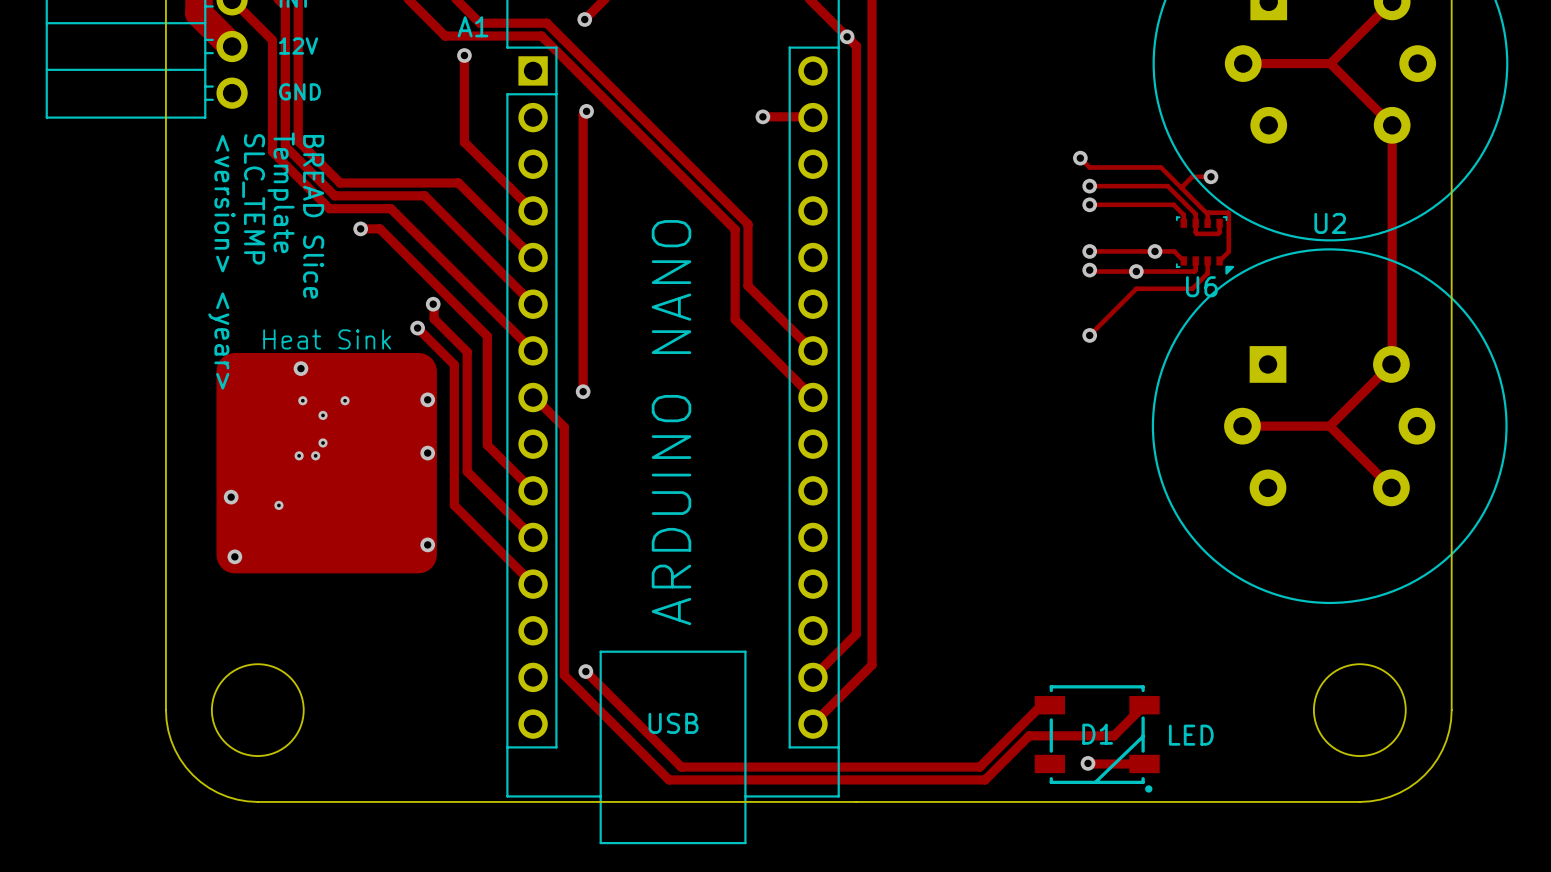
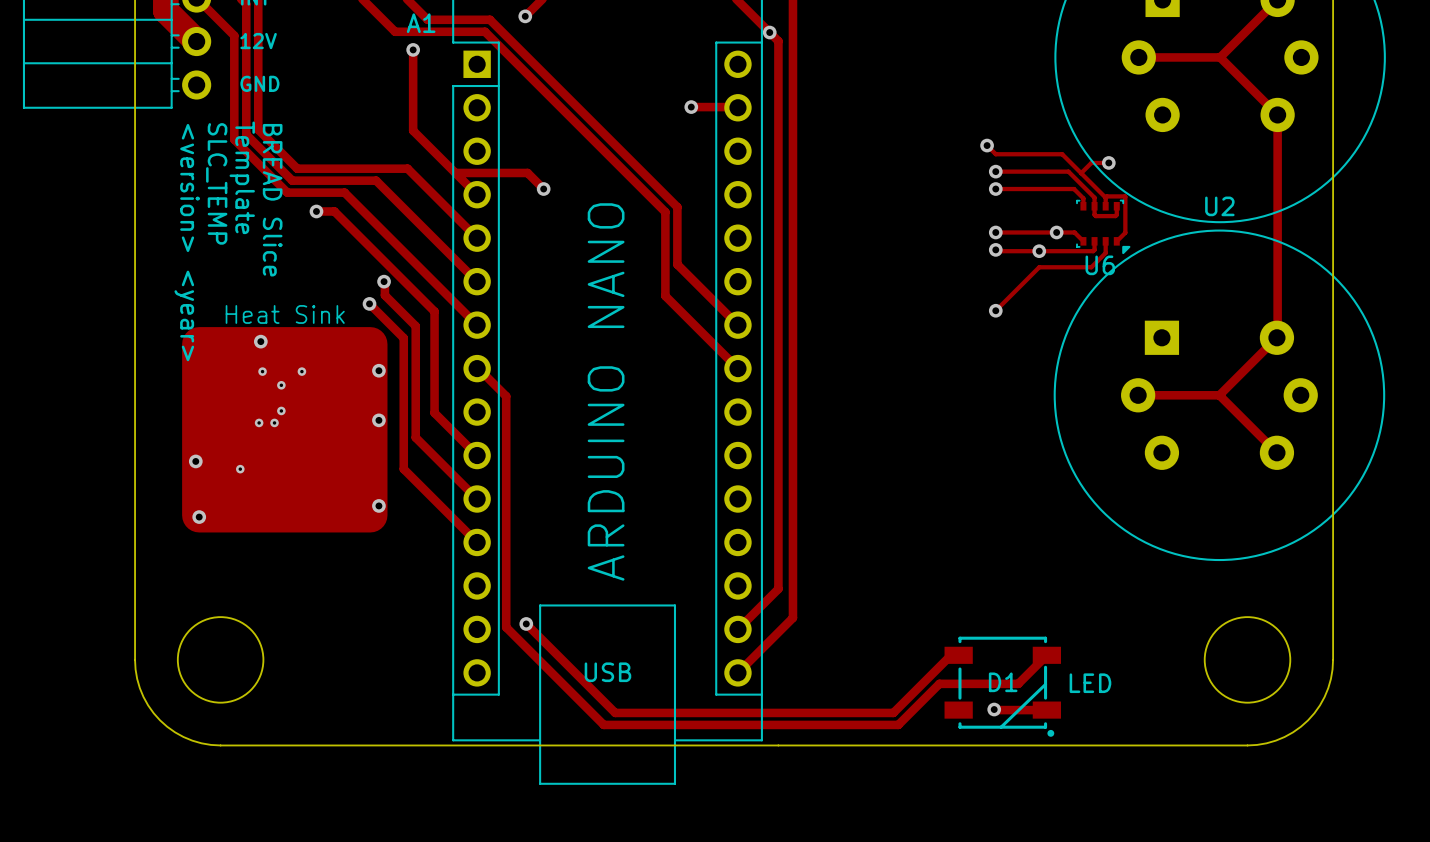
track: (586, 111) (583, 114) (583, 391) -> none
via: (586, 111) -> none
track: none -> (455, 172) (527, 172) (543, 189)
via: none -> (543, 189)
via: (583, 391) -> none

